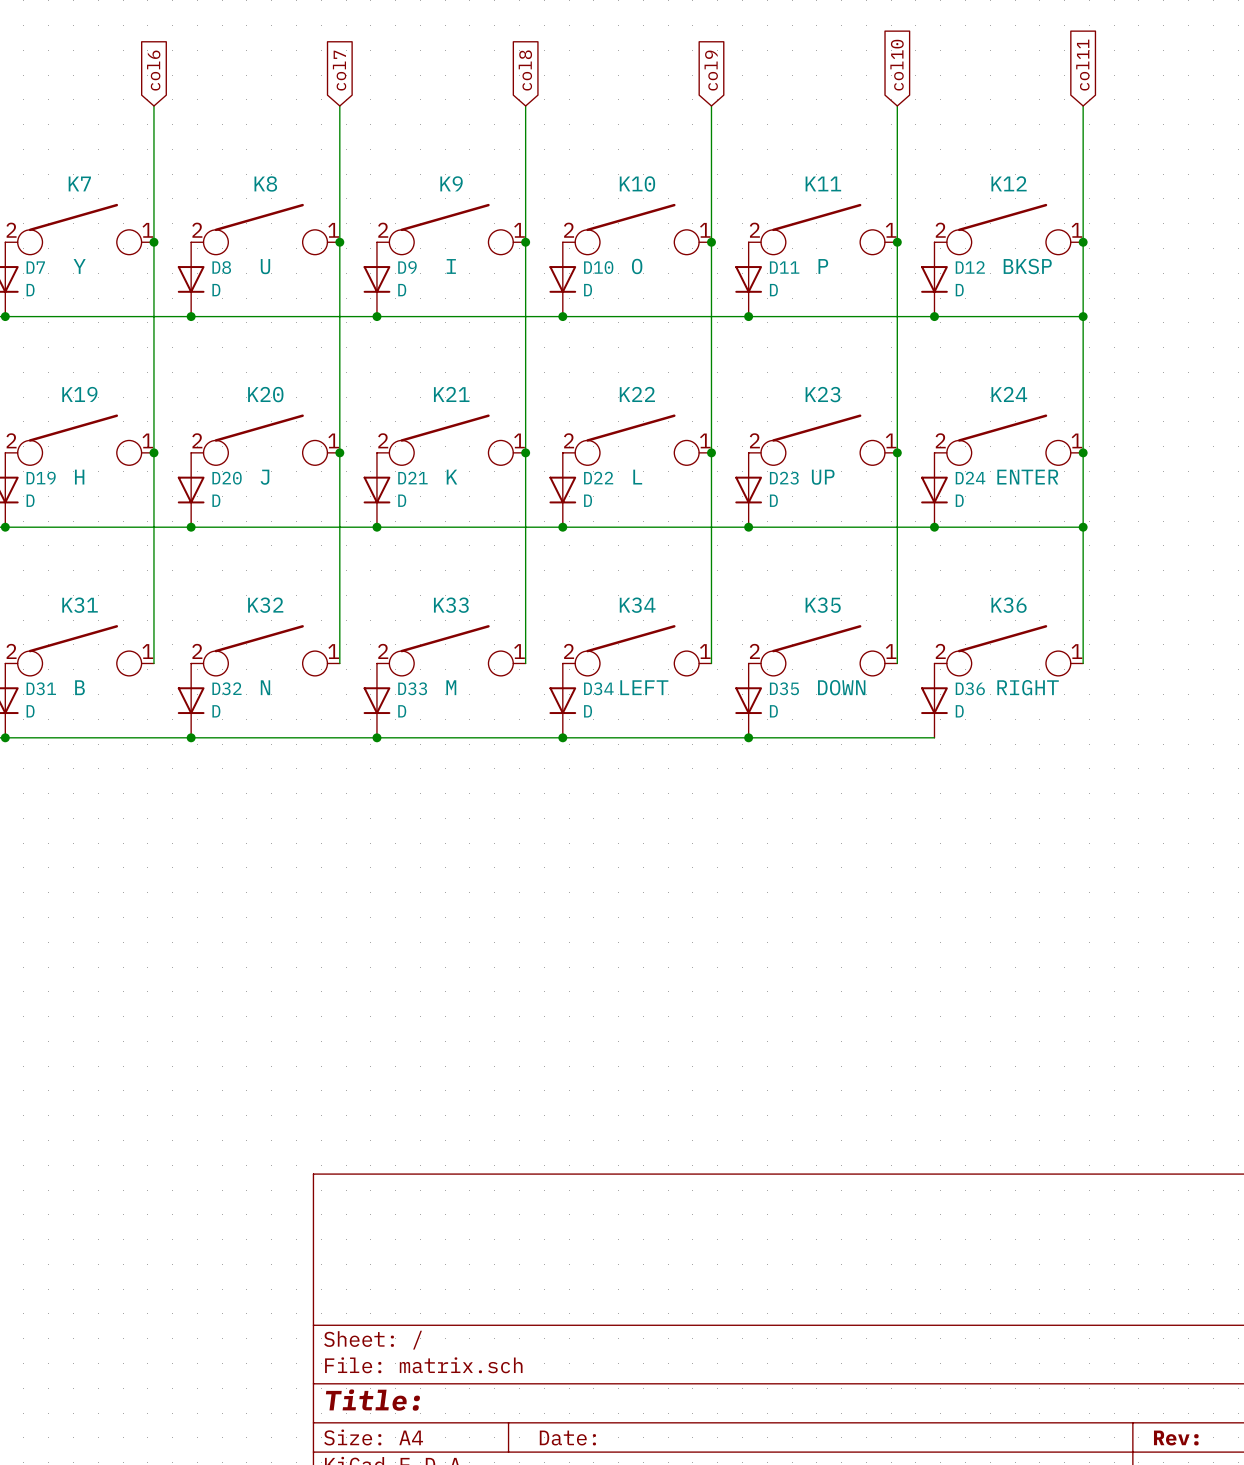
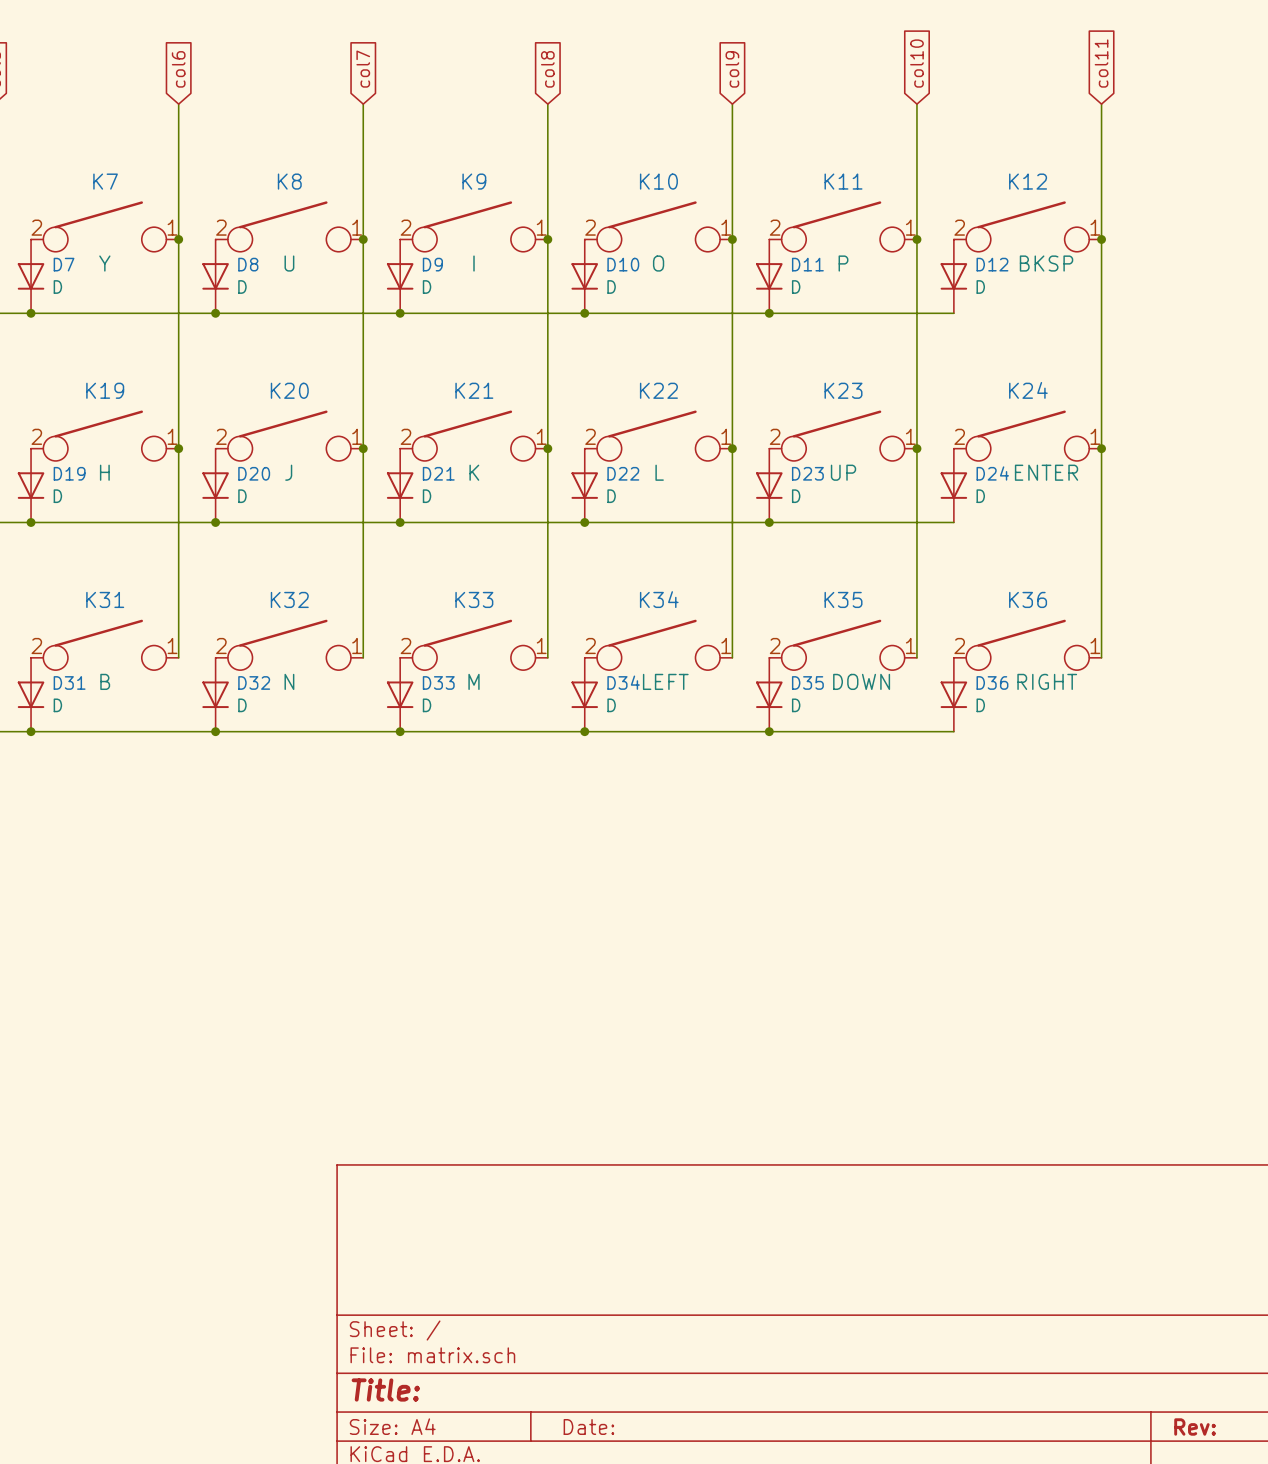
wire: (934, 316) (1083, 316) -> none
junction: (934, 316) -> none
junction: (1083, 316) -> none
wire: (934, 527) (1083, 527) -> none
junction: (934, 527) -> none
junction: (1083, 527) -> none

